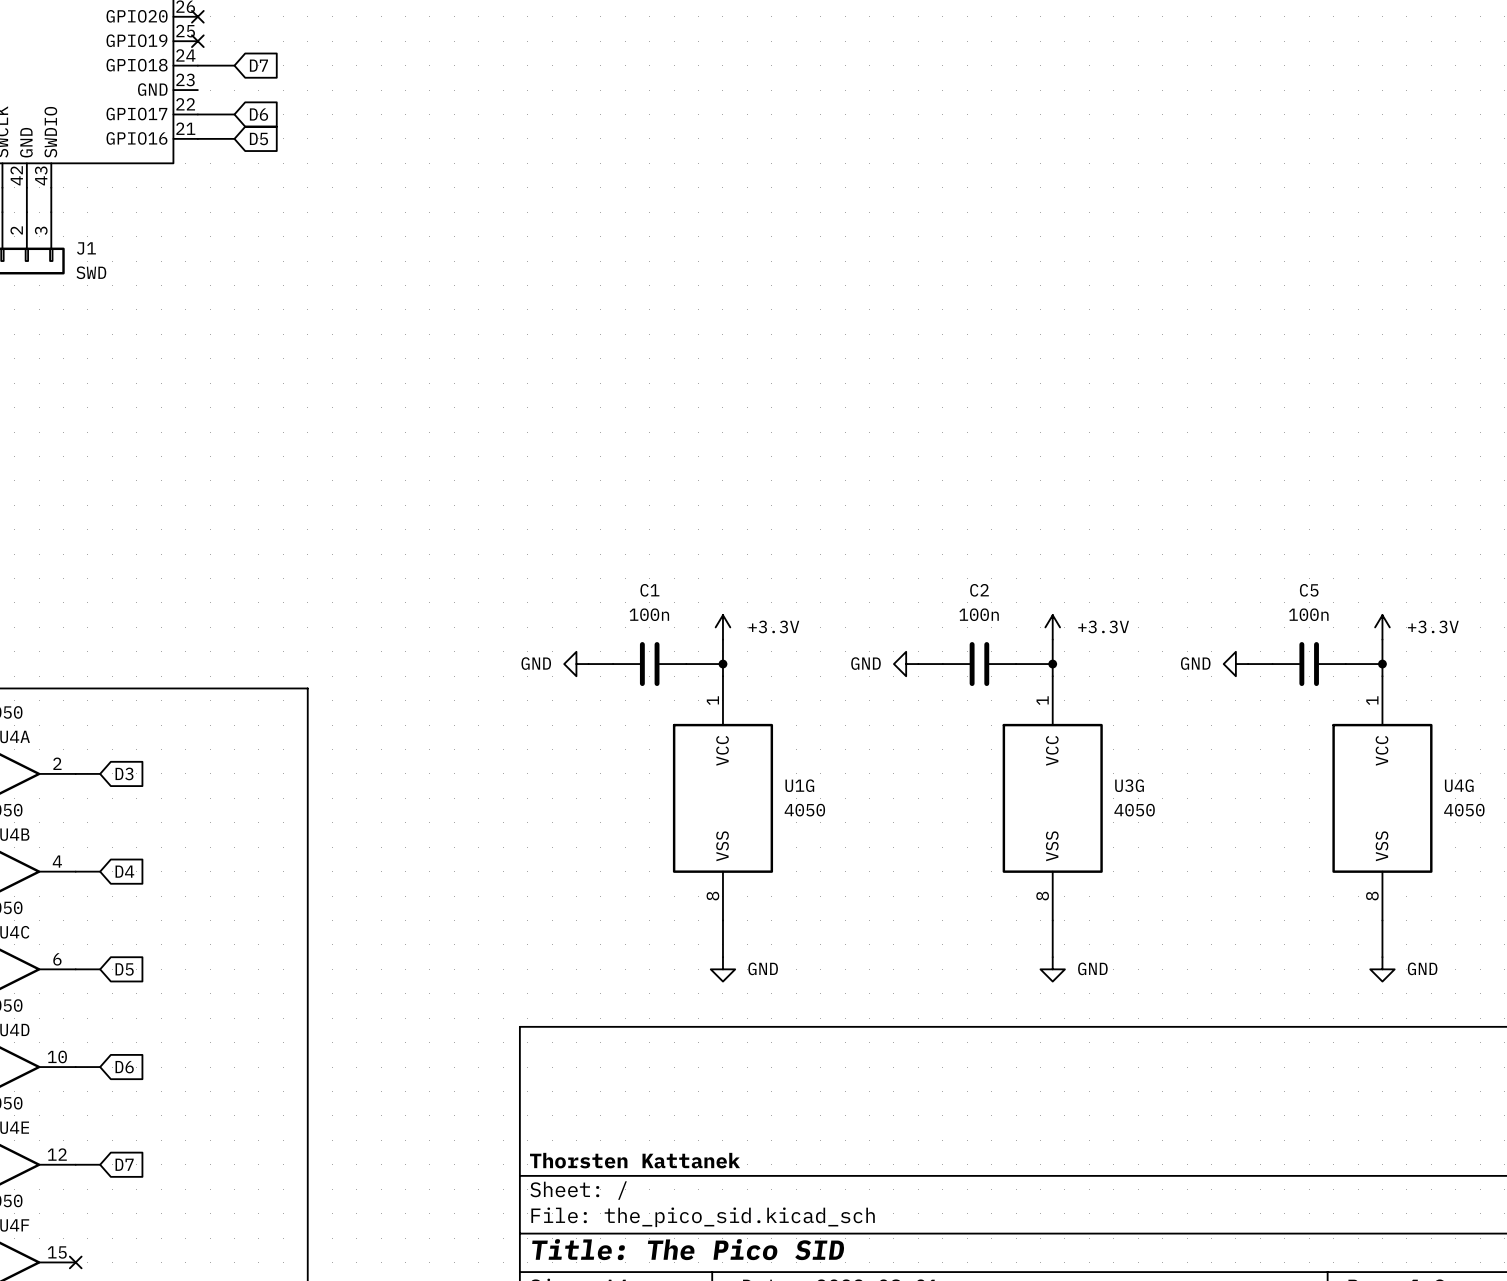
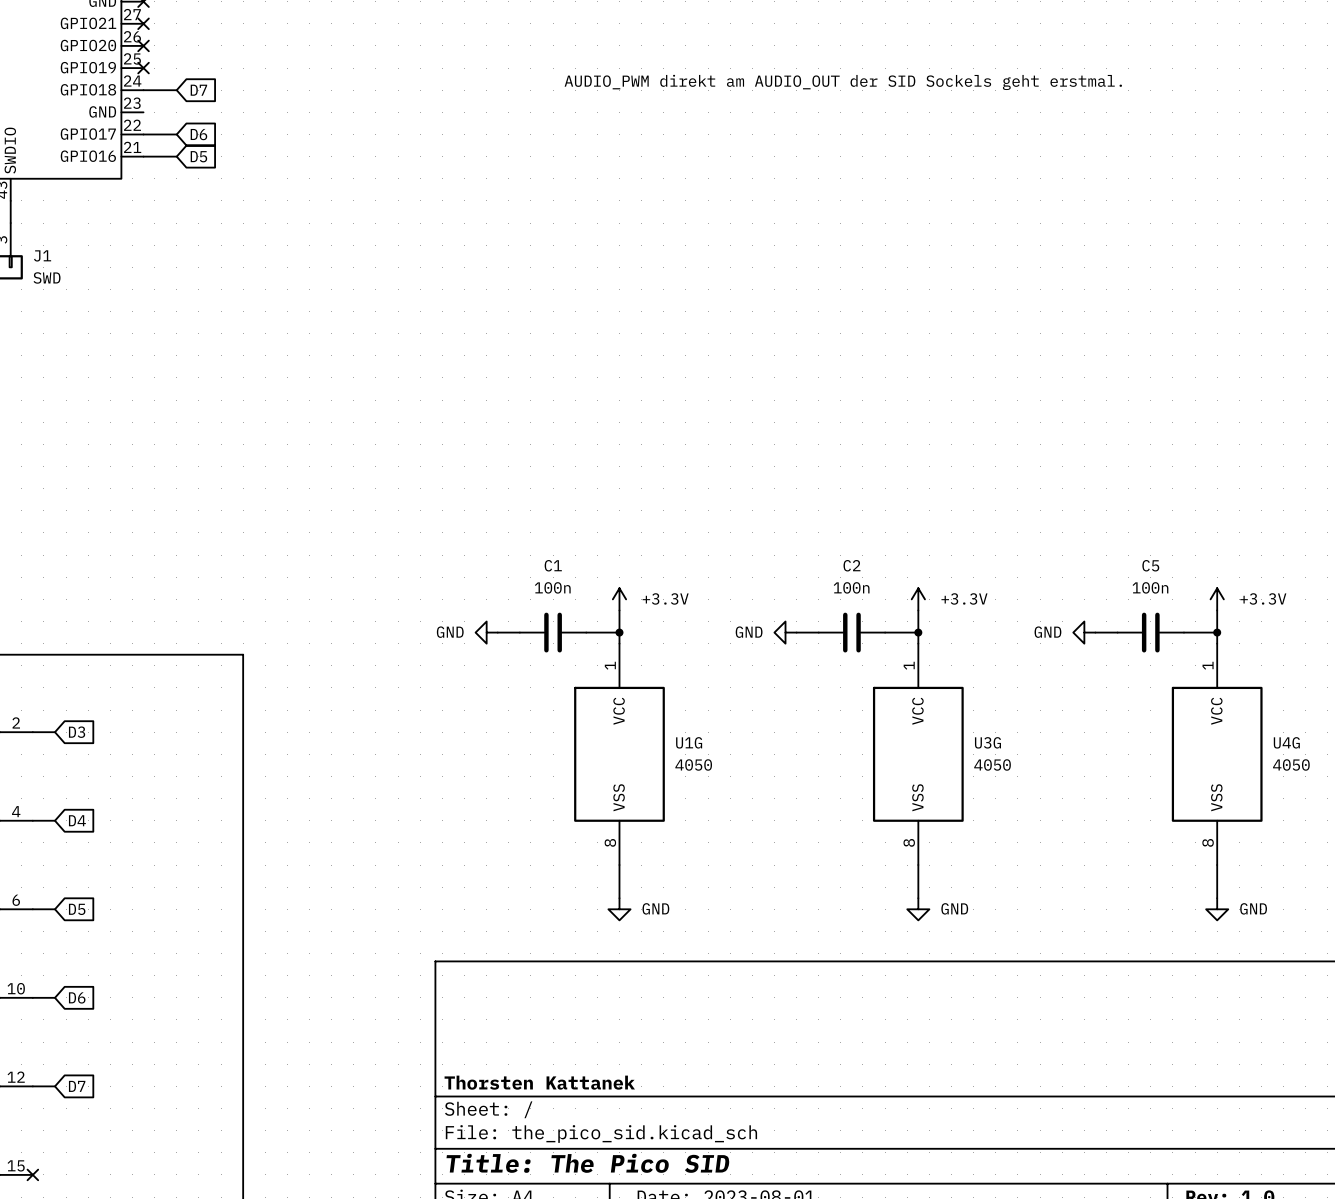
text: none -> AUDIO_PWM direkt am AUDIO_OUT der SID Sockels geht erstmal. (843, 82)

